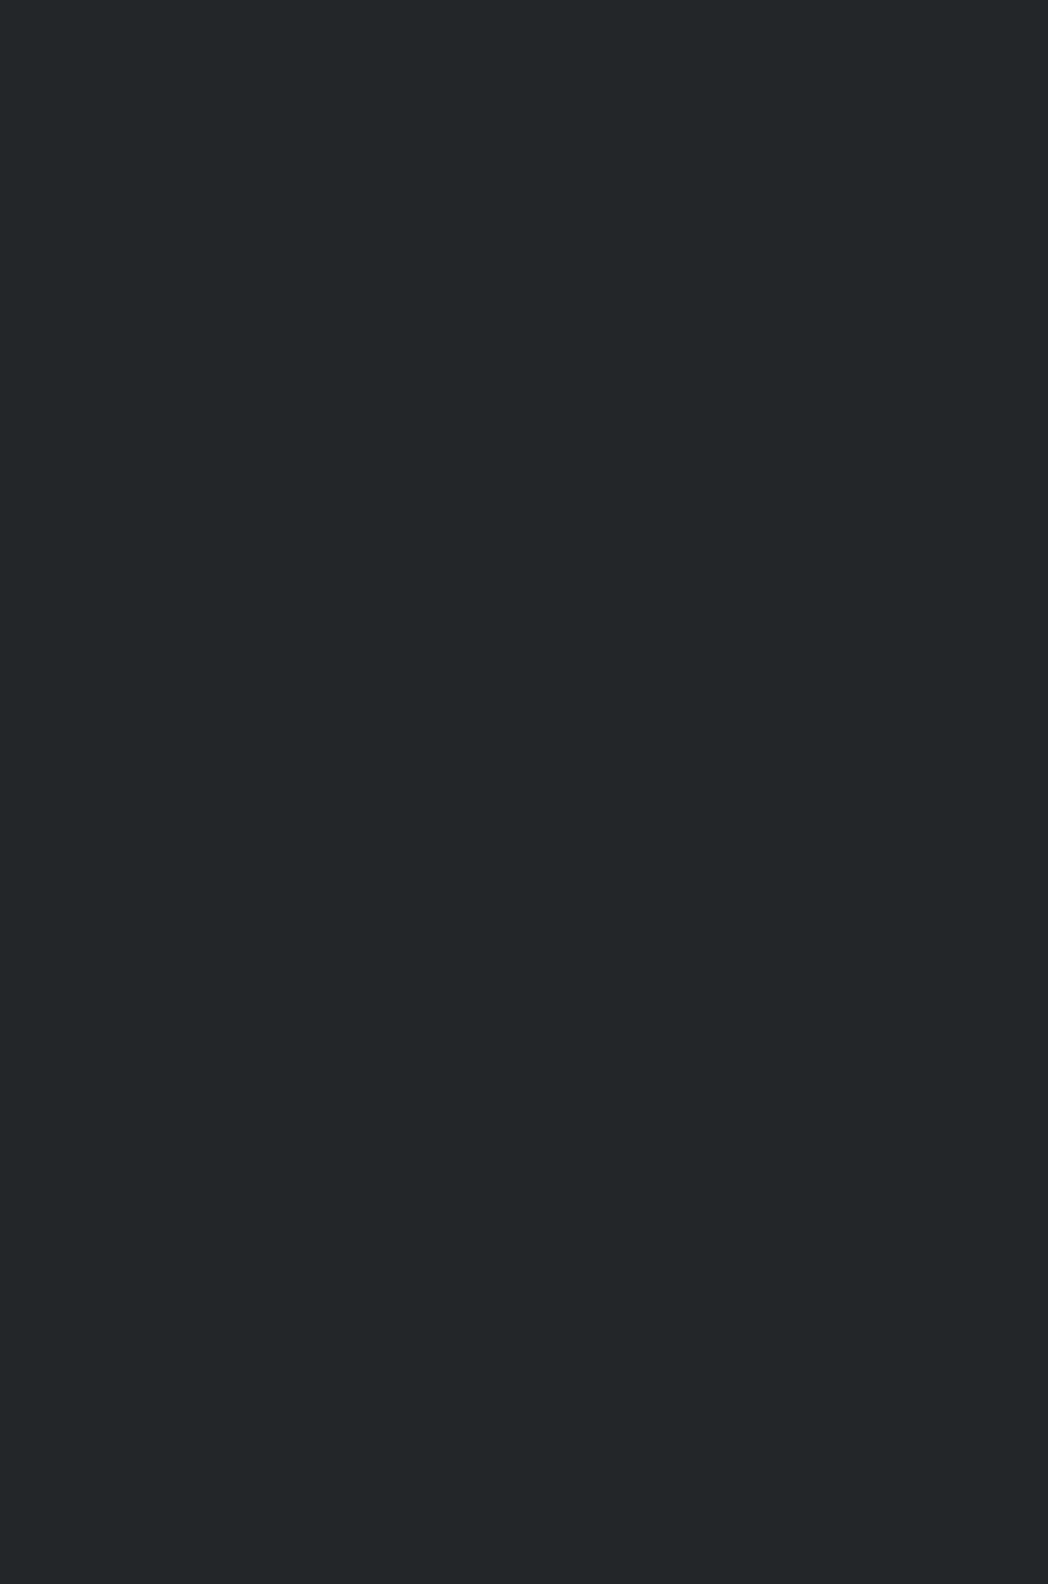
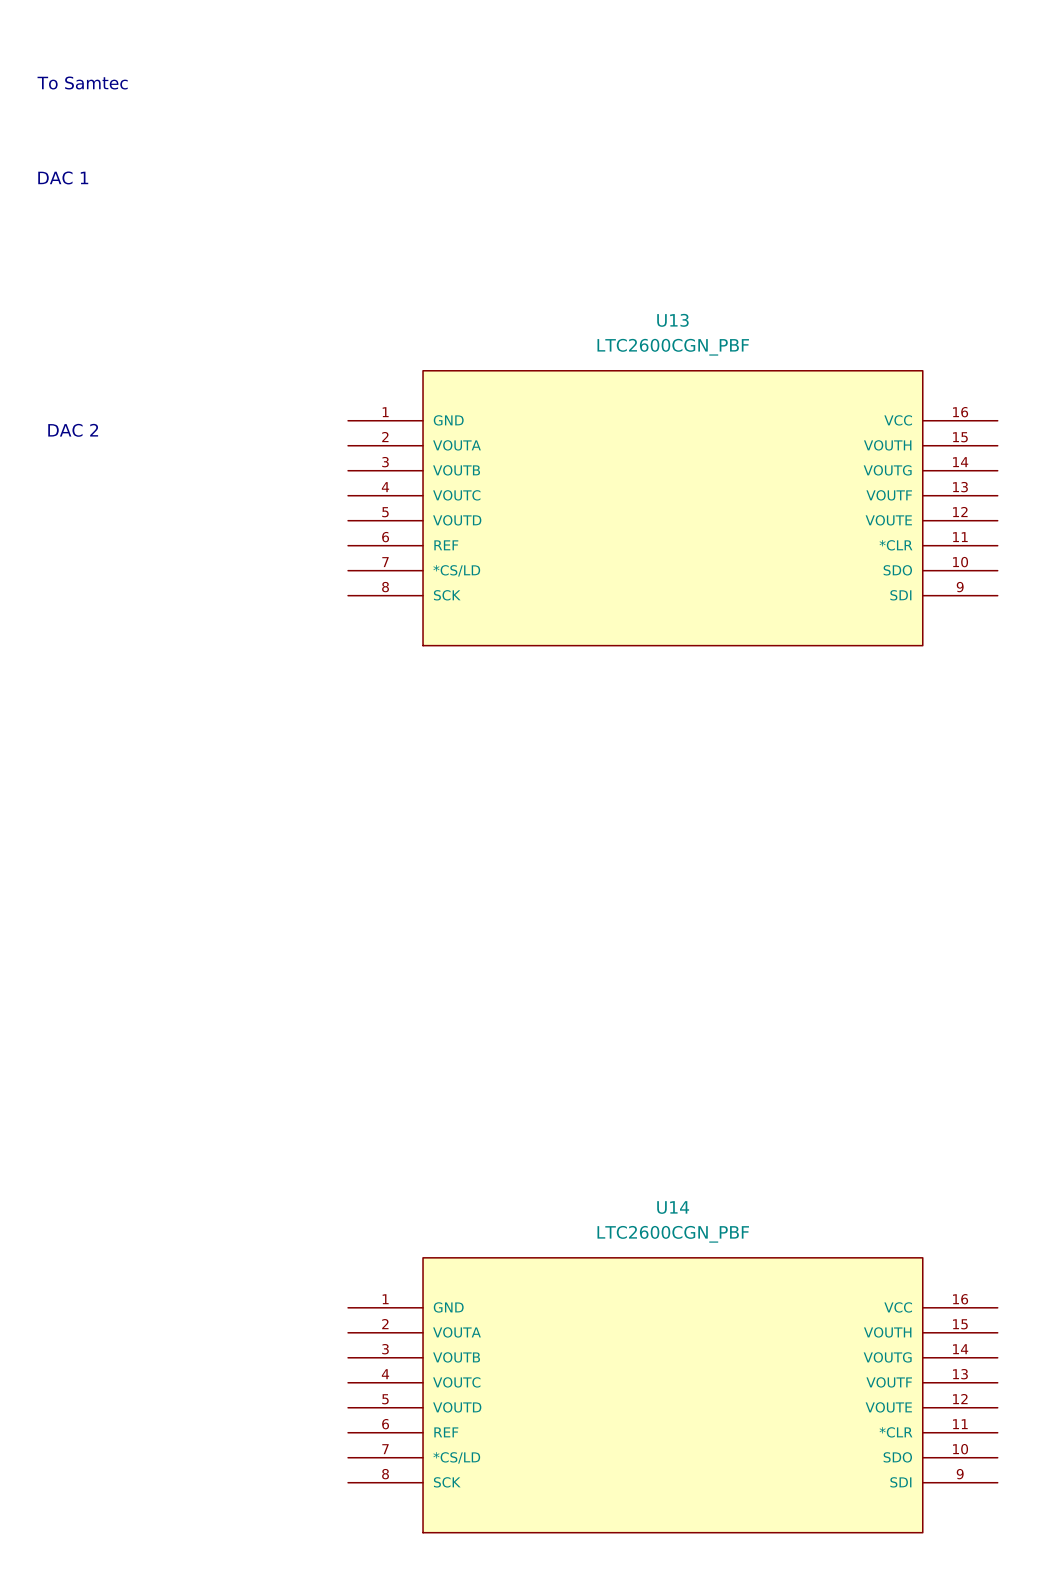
text: none -> To Samtec (82, 83)
text: none -> DAC 1 (63, 177)
text: none -> DAC 2 (73, 430)
U13: none -> LTC2600CGN_PBF (672, 508)
U14: none -> LTC2600CGN_PBF (672, 1395)

